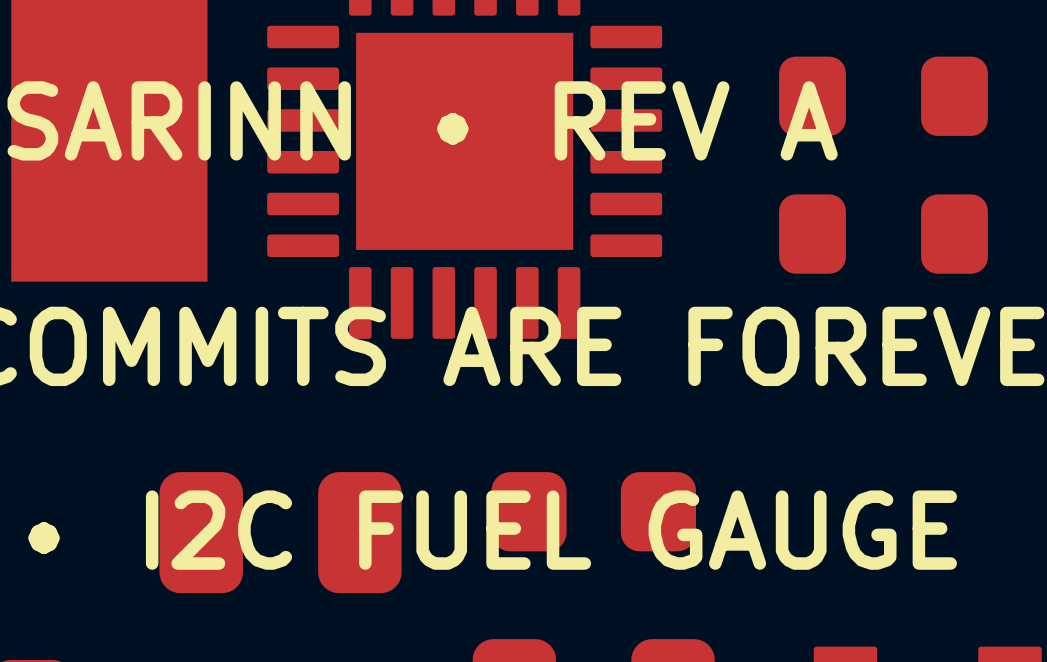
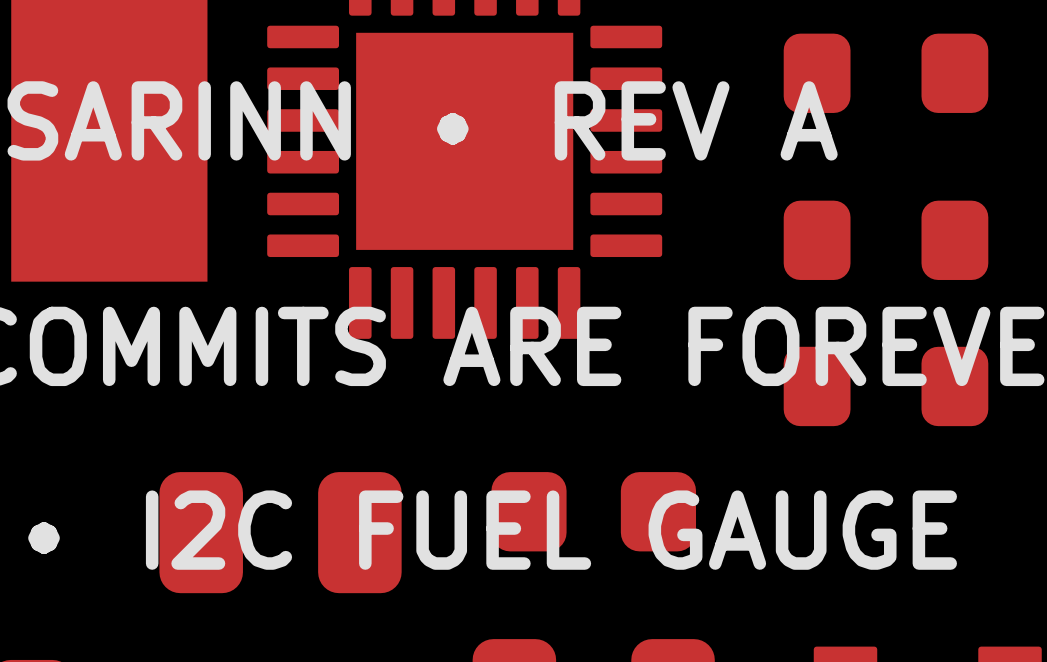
part: none -> (886, 73)
part: (812, 165) -> none
part: (954, 165) -> none
part: none -> (886, 240)
part: none -> (886, 386)

